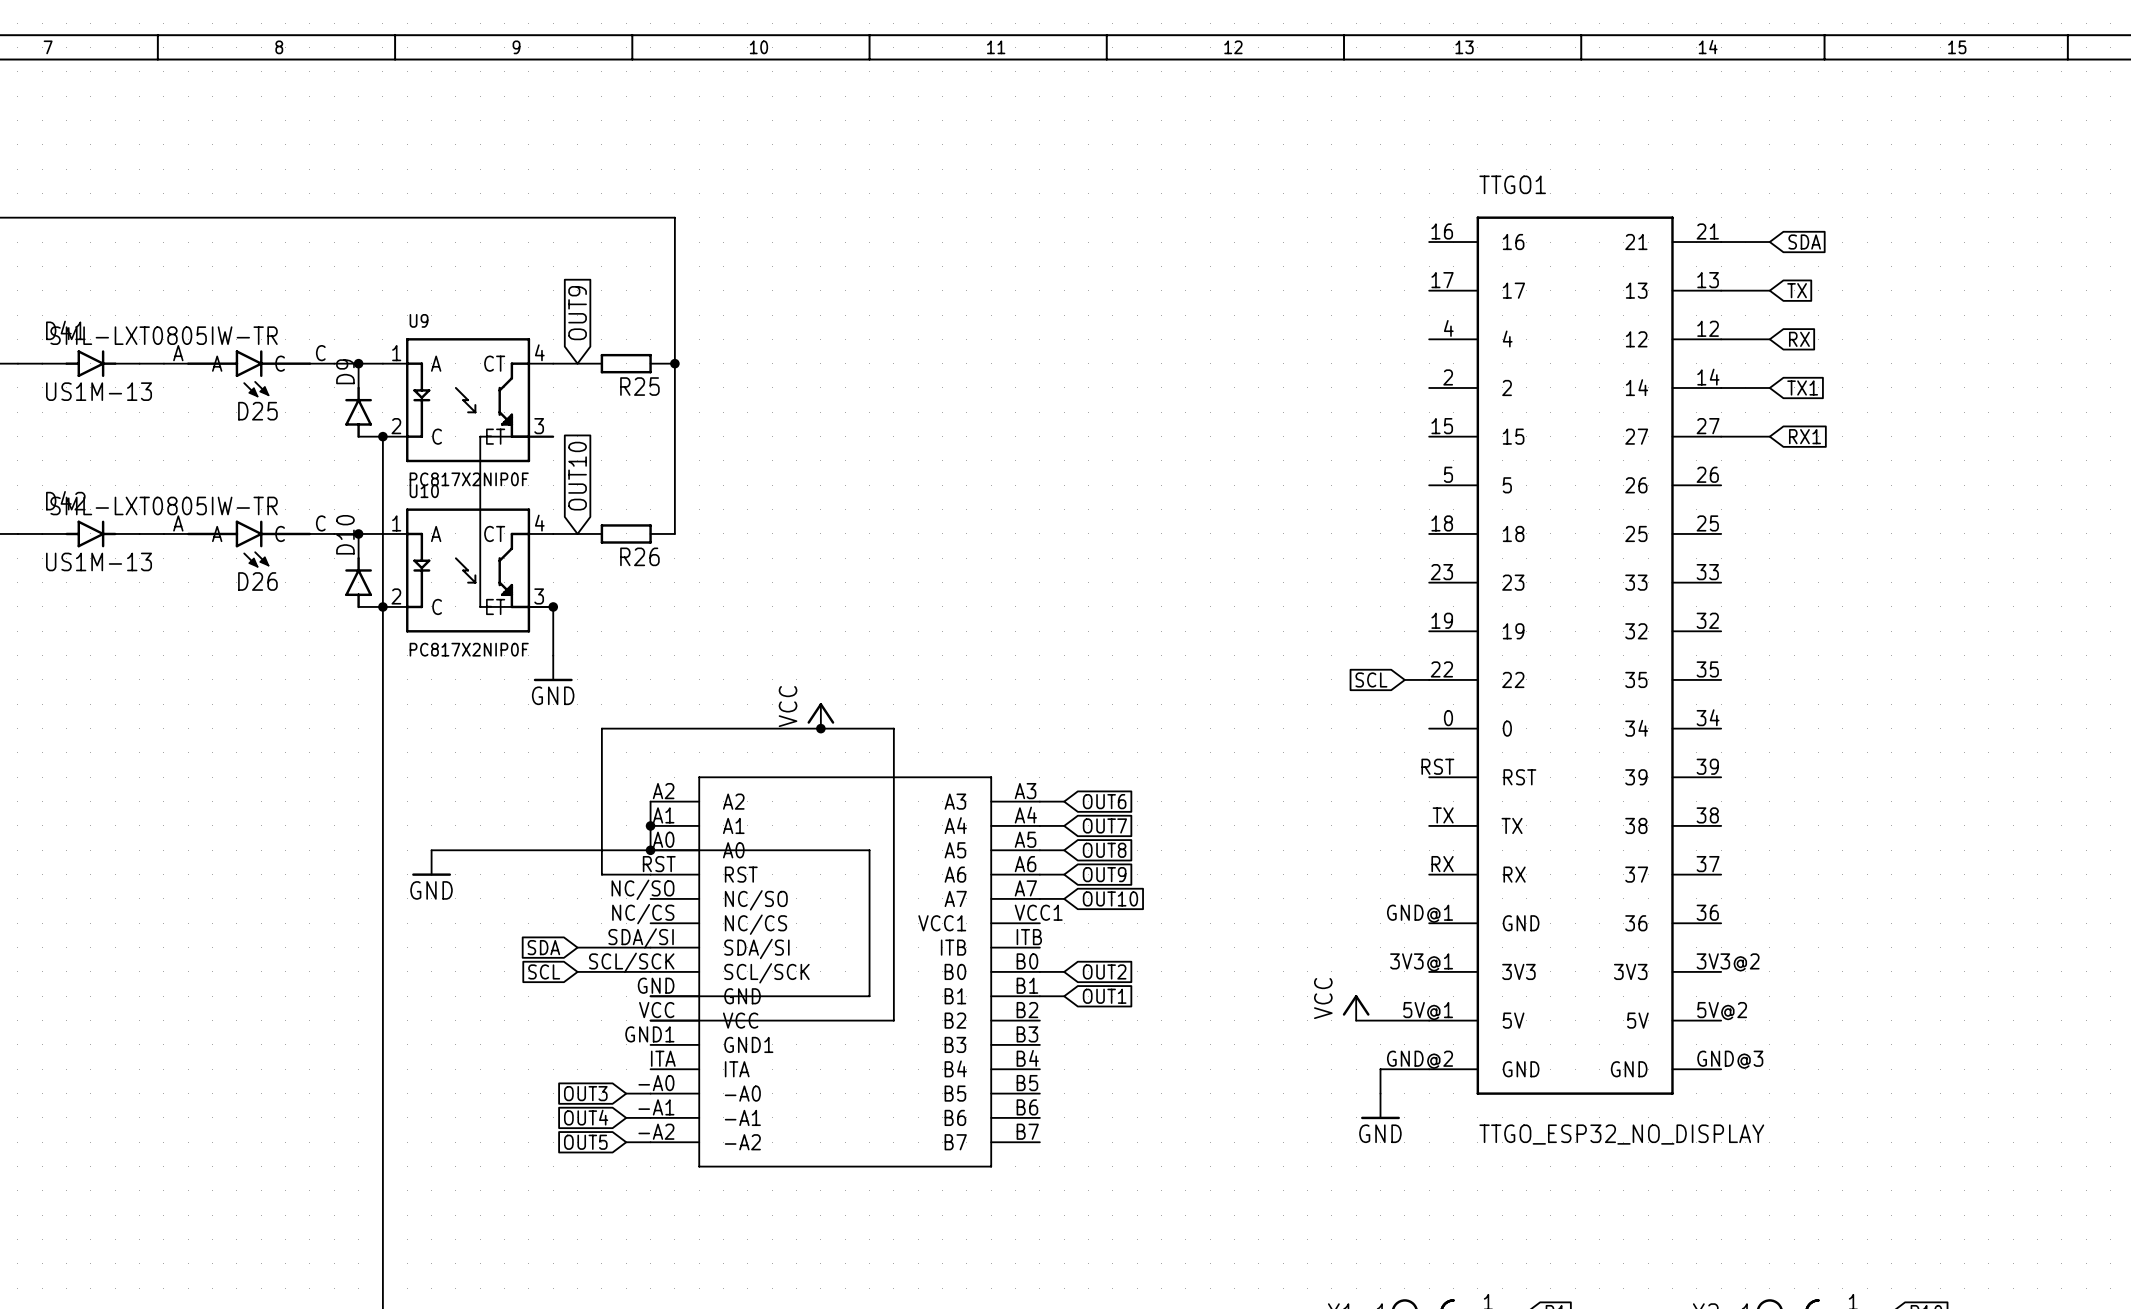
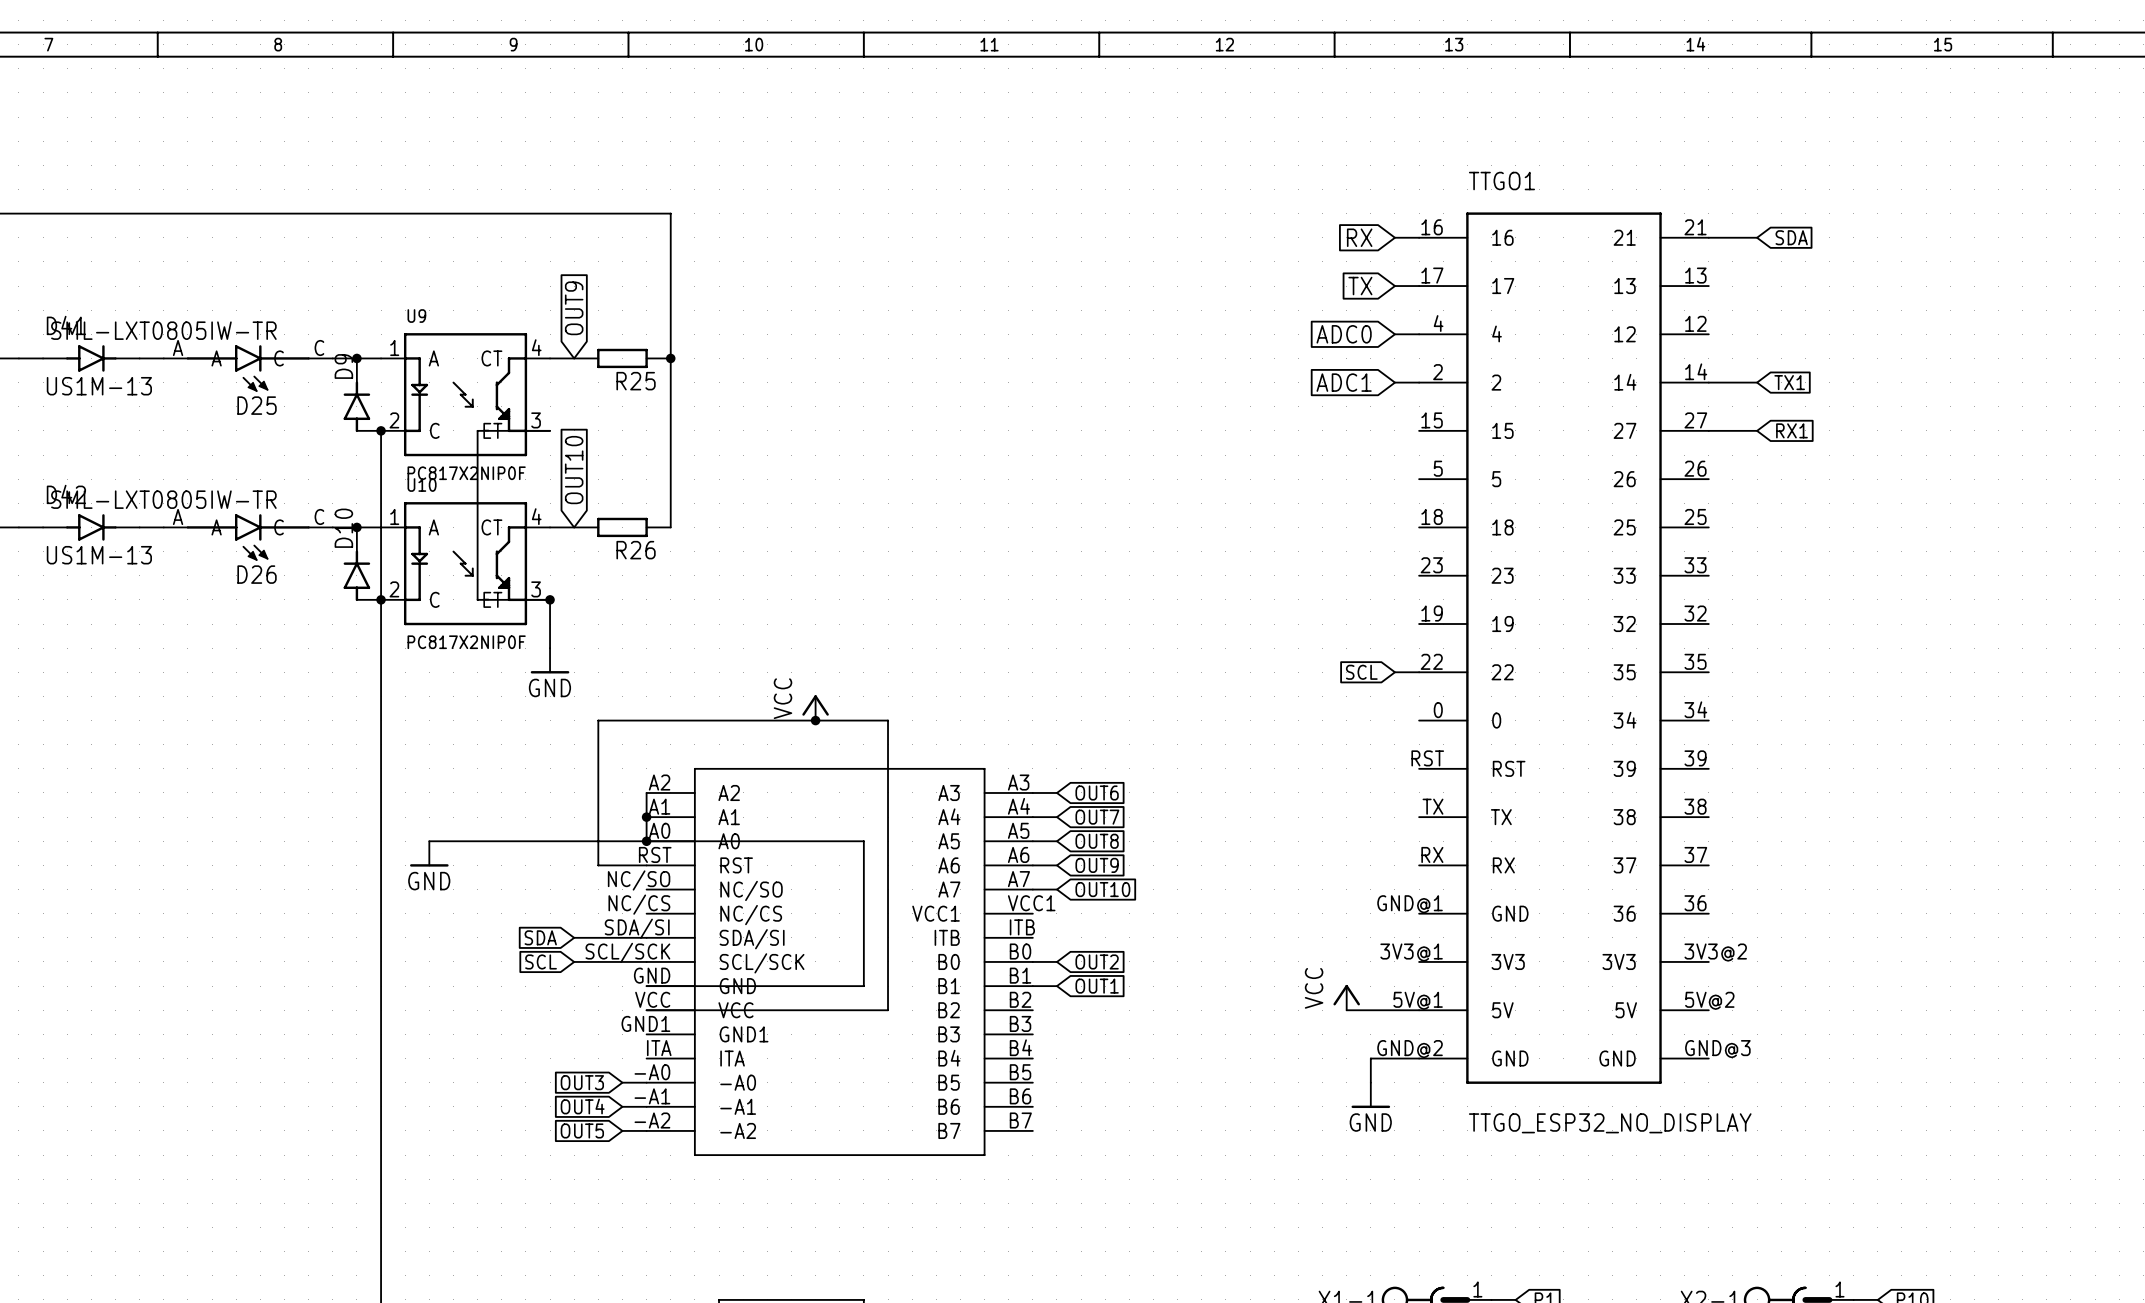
global label: none -> RX (1359, 237)
wire: none -> (1394, 237) (1419, 237)
global label: none -> TX (1360, 286)
wire: none -> (1394, 286) (1419, 286)
wire: (1721, 290) (1769, 290) -> none
global label: TX (1797, 290) -> none
global label: none -> ADC0 (1344, 334)
wire: none -> (1394, 334) (1419, 334)
wire: (1721, 339) (1769, 339) -> none
global label: RX (1799, 339) -> none
global label: none -> ADC1 (1344, 382)
wire: none -> (1394, 382) (1419, 382)

